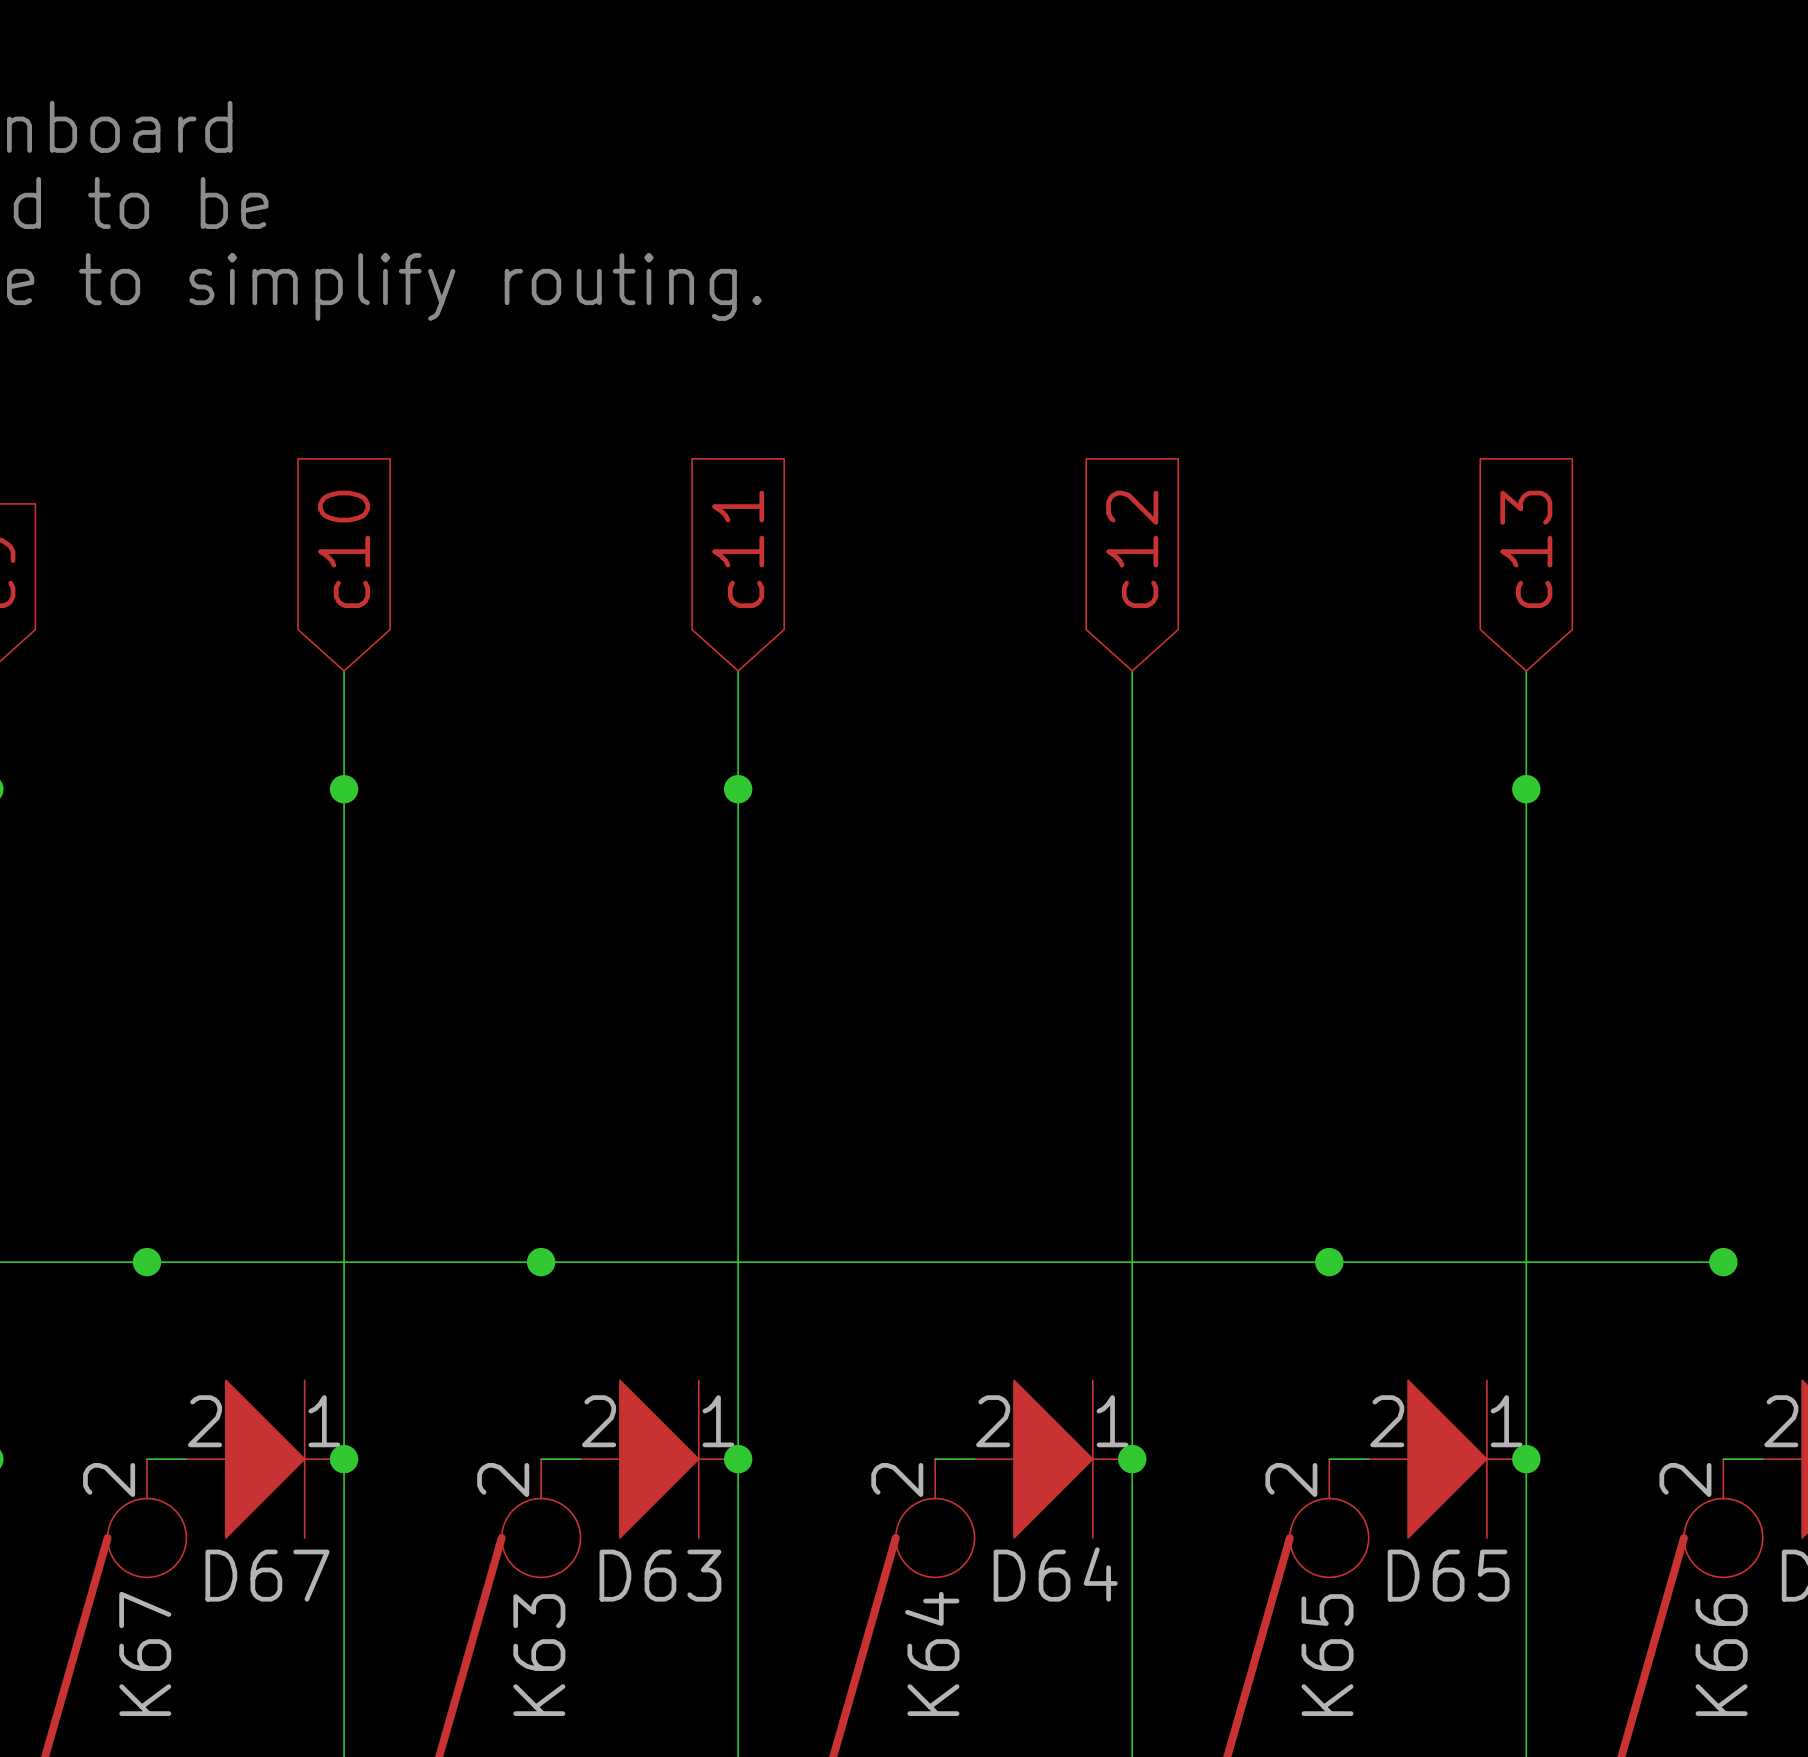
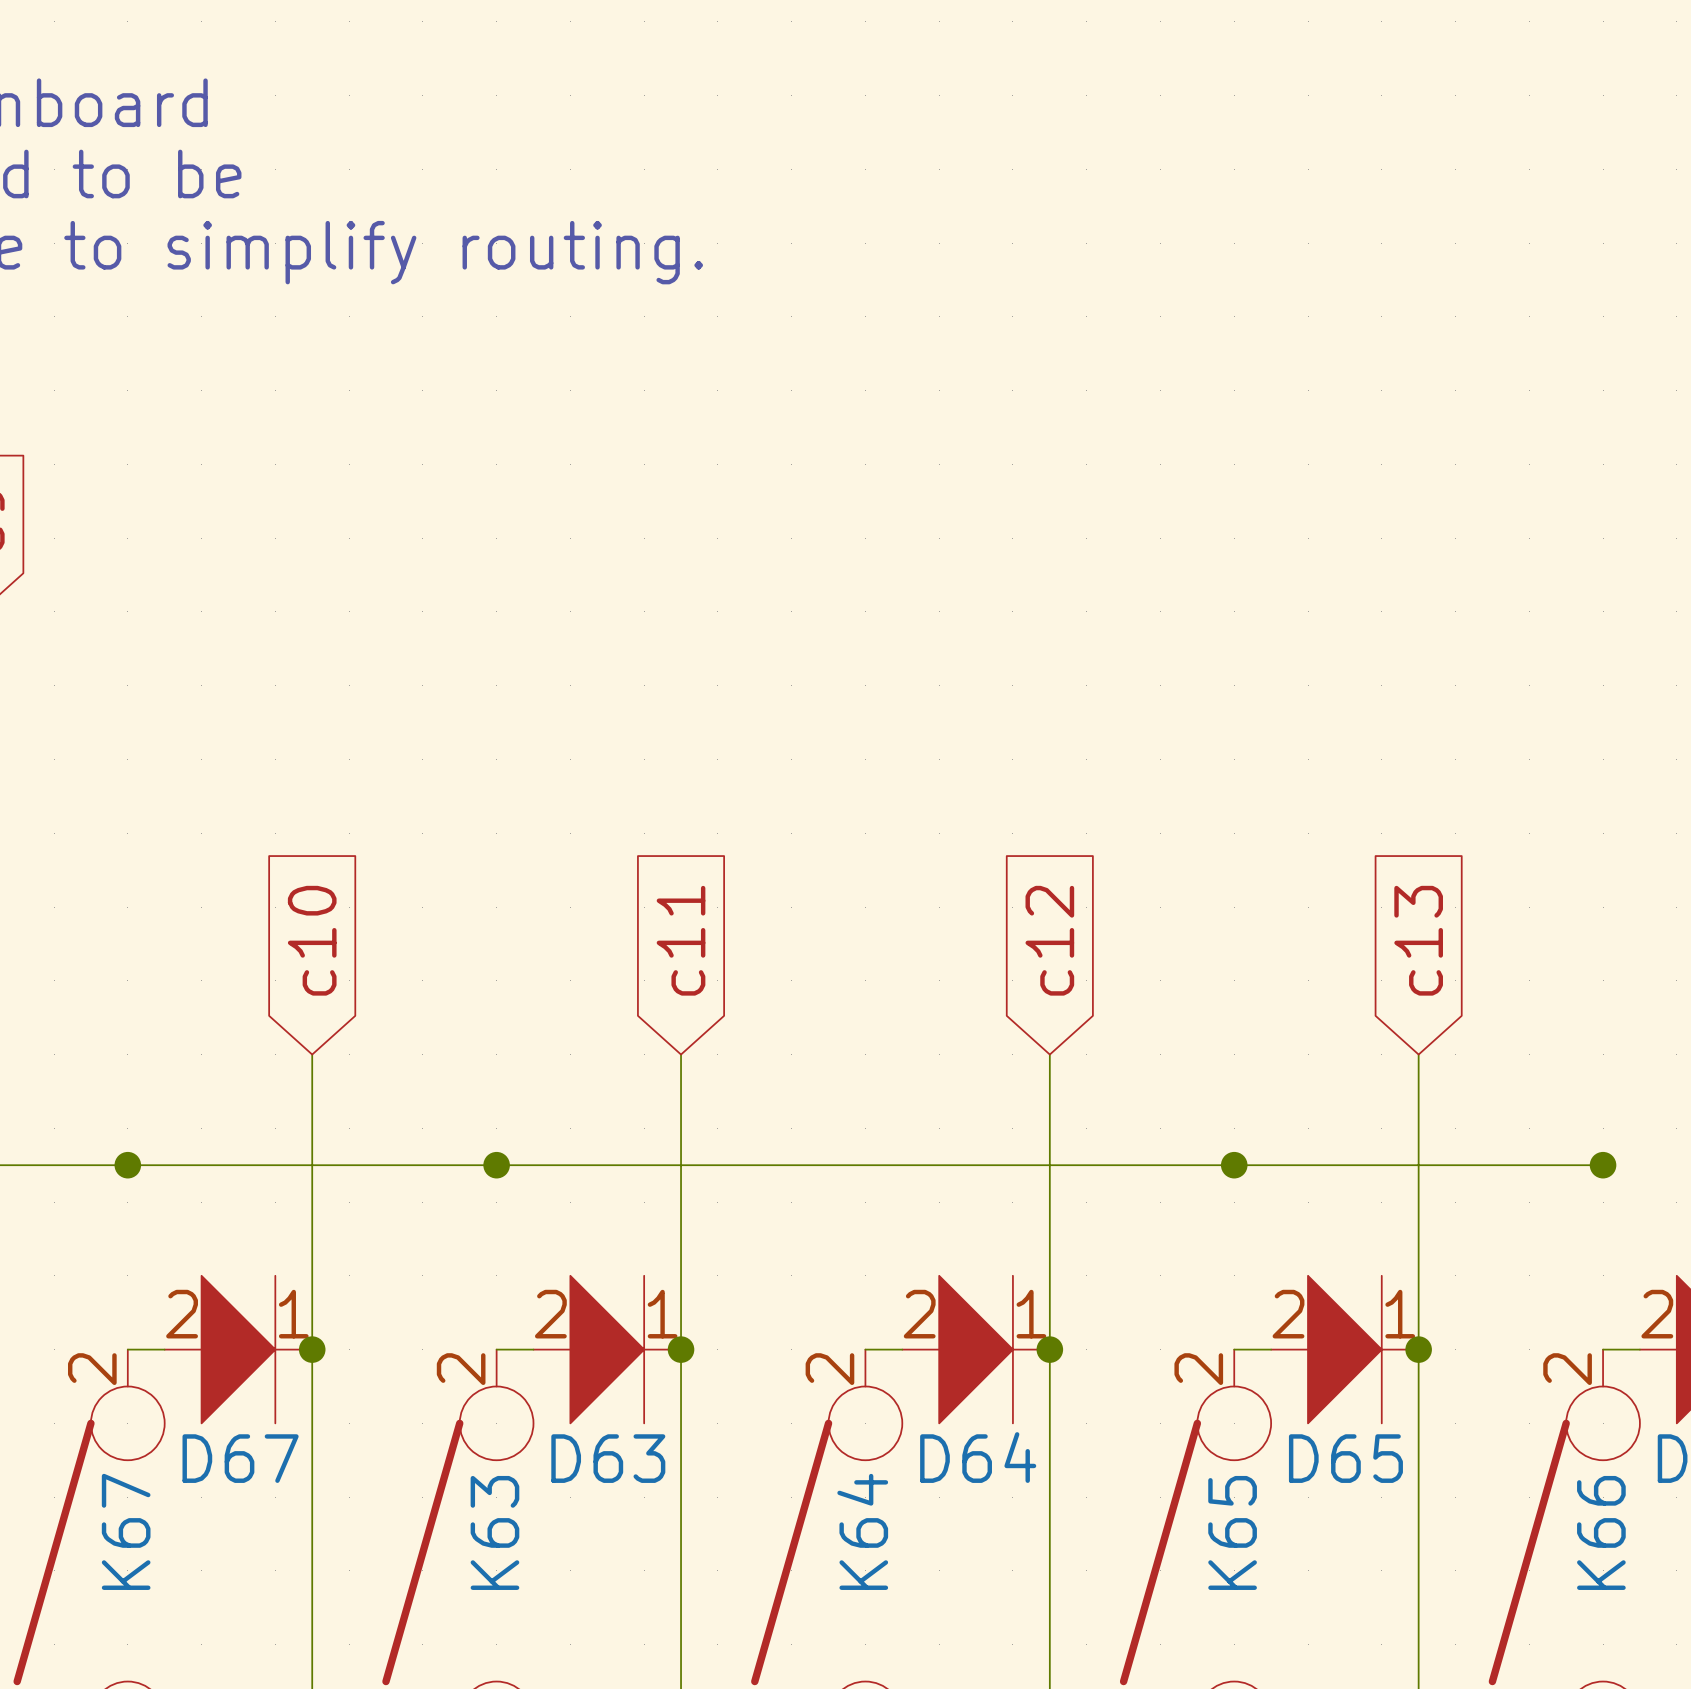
global label position: c10 (344, 549) -> c10 (312, 940)
global label position: c11 (738, 549) -> c11 (681, 940)
global label position: c12 (1132, 549) -> c12 (1049, 940)
global label position: c13 (1526, 549) -> c13 (1418, 940)
wire: (344, 670) (344, 1143) -> none
wire: (738, 670) (738, 1143) -> none
wire: (1132, 670) (1132, 1143) -> none
wire: (1526, 670) (1526, 1143) -> none
junction: (344, 789) -> none
junction: (738, 789) -> none
junction: (1526, 789) -> none

